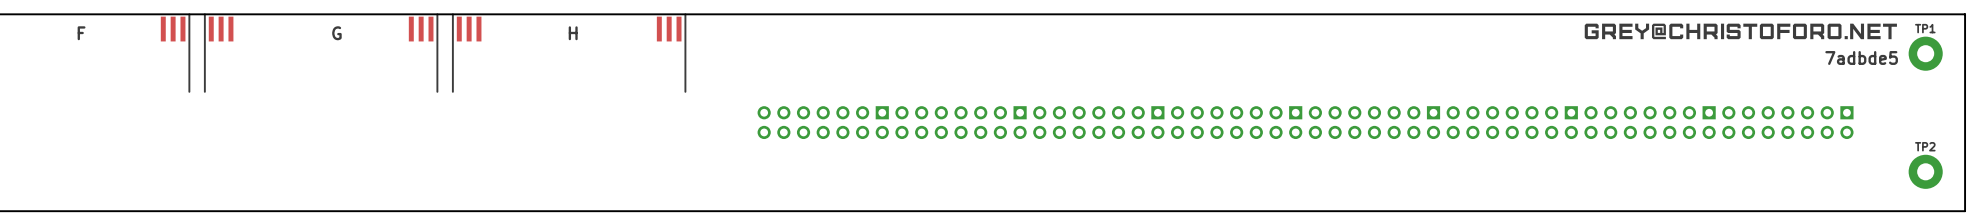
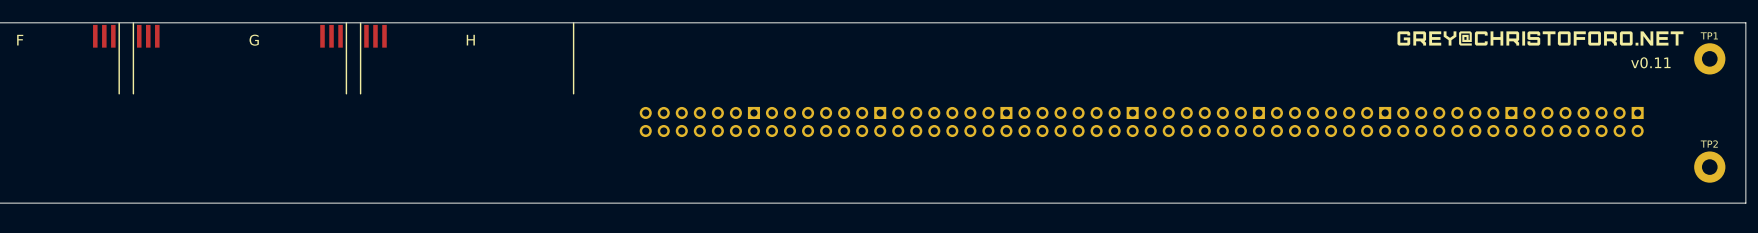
part: (669, 29) -> none
text: 7adbde5 (1861, 57) -> v0.11 (1650, 62)

